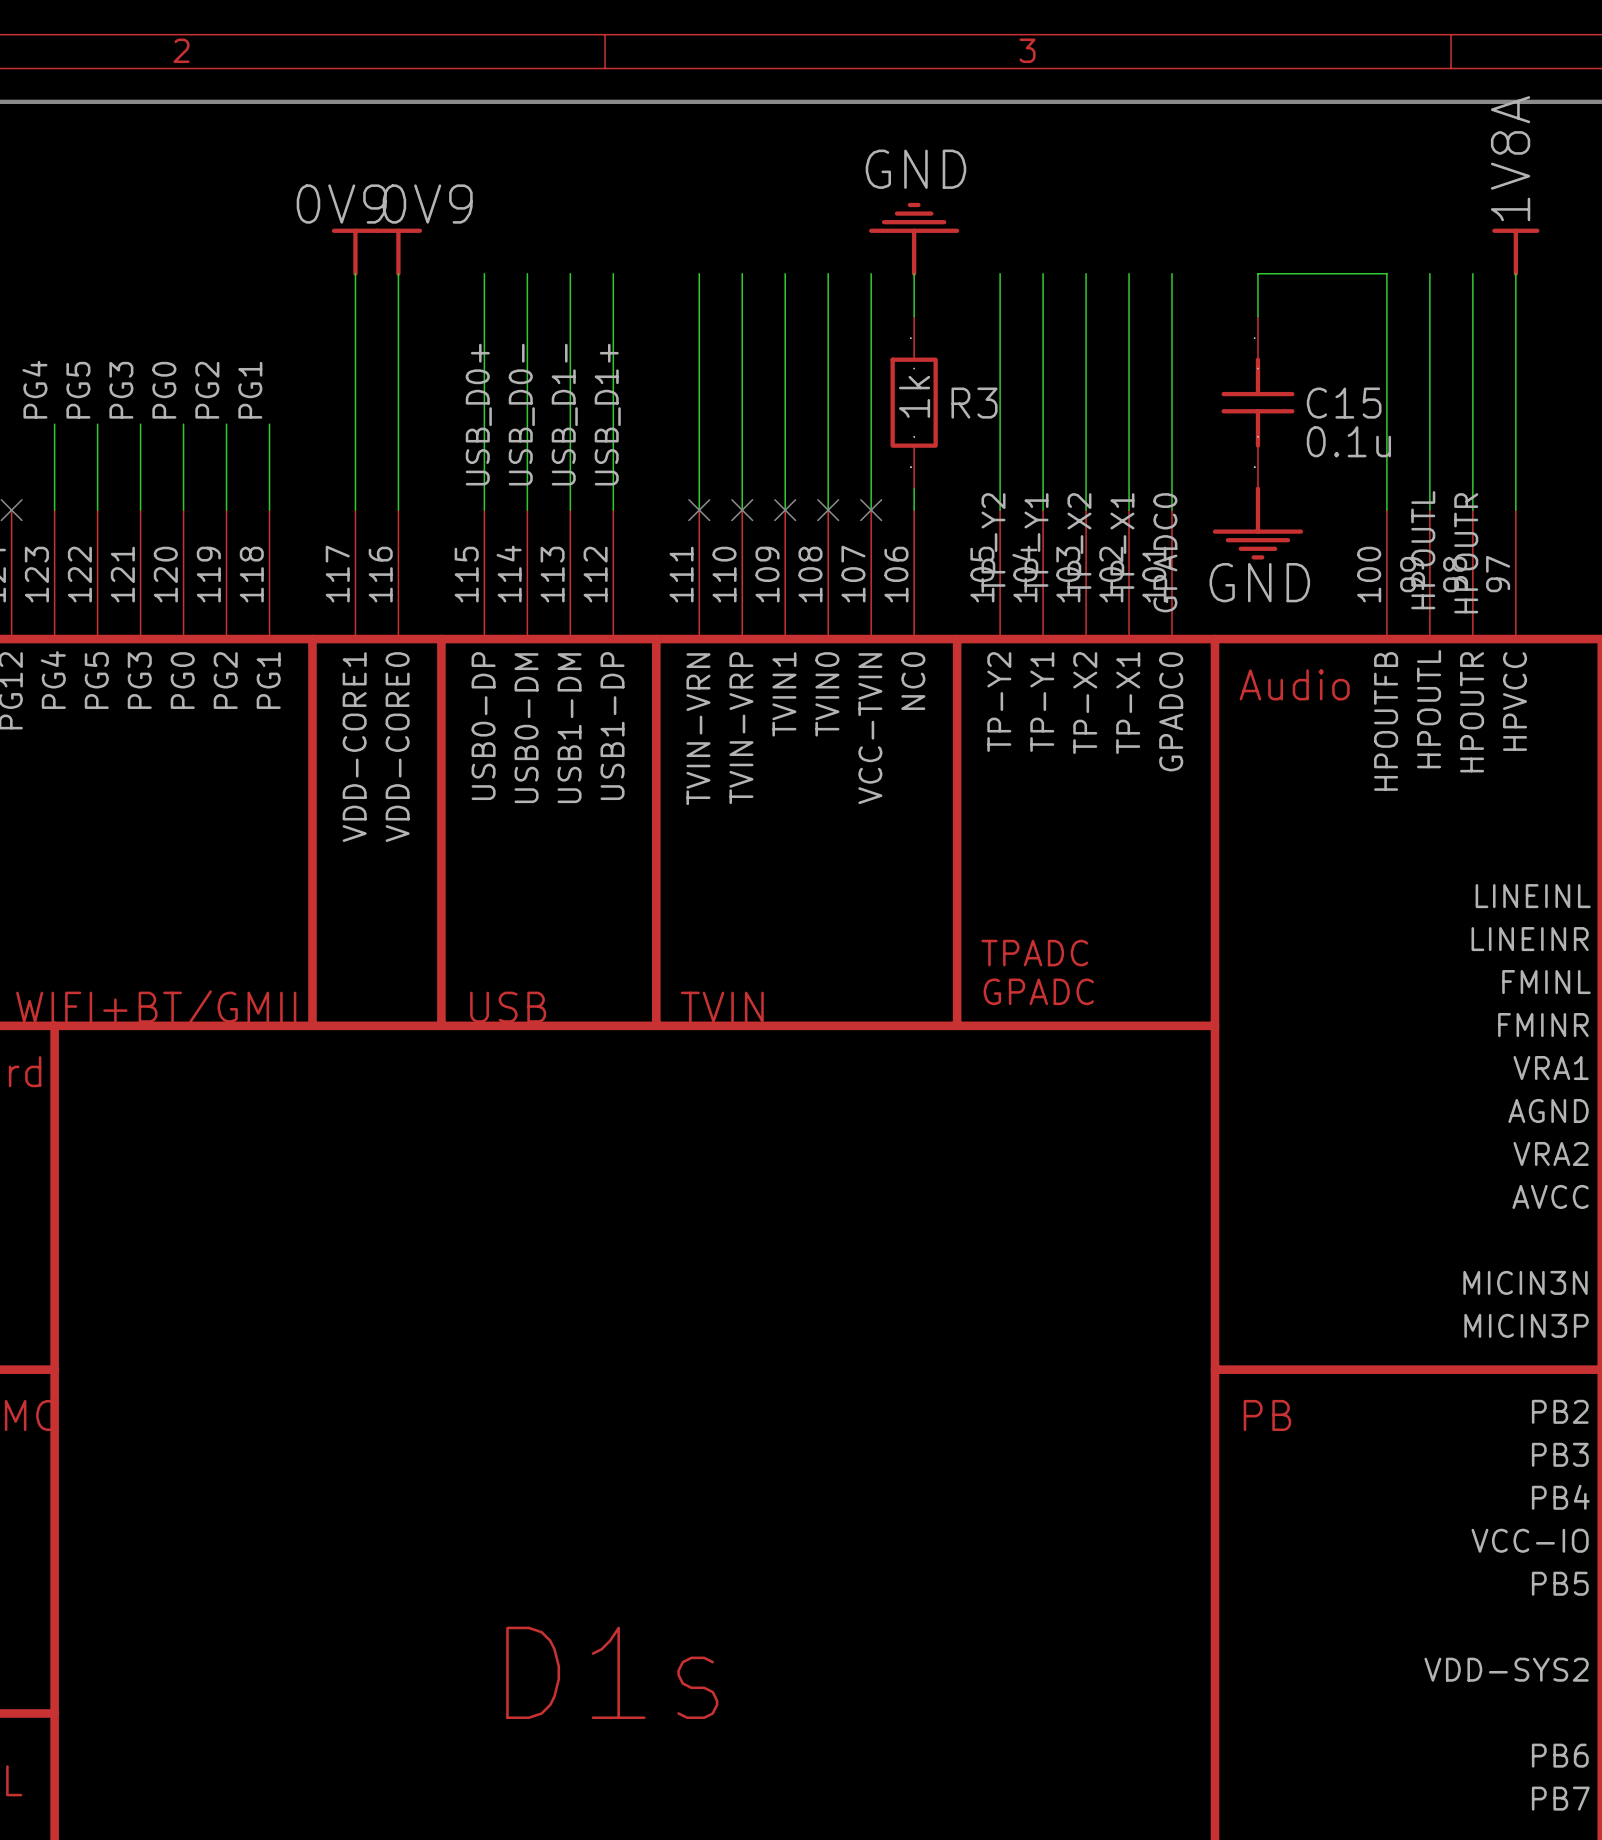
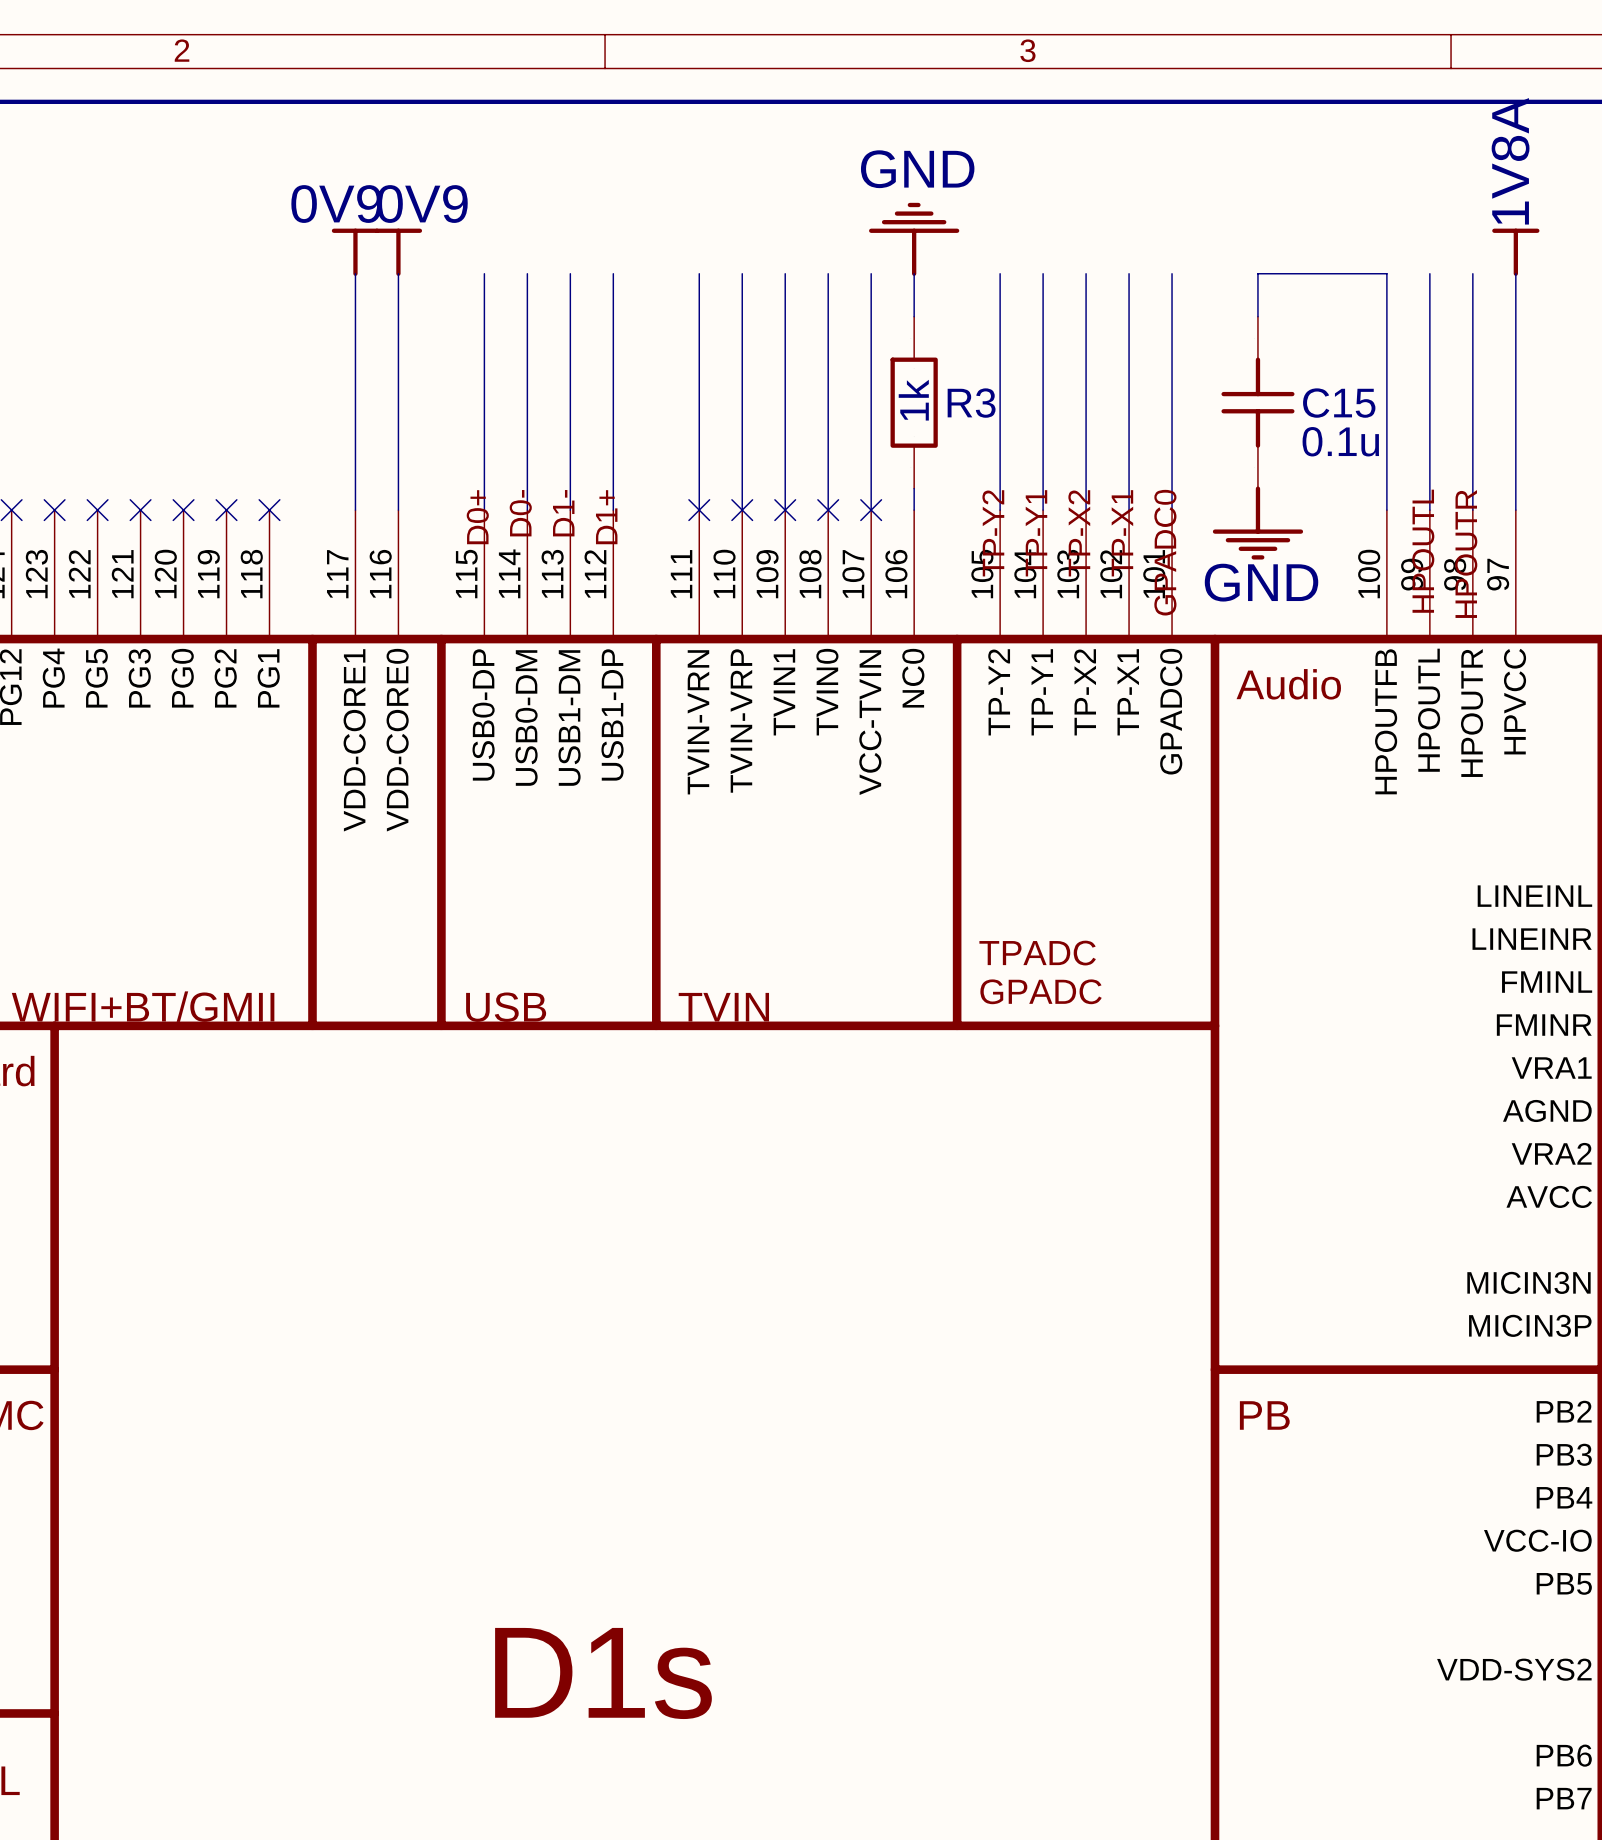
label: PG4 (34, 389) -> none
label: PG5 (78, 390) -> none
label: PG3 (121, 390) -> none
label: PG0 (164, 390) -> none
label: PG2 (207, 390) -> none
label: PG1 (250, 390) -> none
label: USB_D0+ (478, 414) -> none
label: USB_D0- (521, 414) -> none
label: USB_D1- (564, 414) -> none
label: USB_D1+ (607, 414) -> none
wire: (54, 424) (54, 510) -> none
wire: (97, 424) (97, 510) -> none
wire: (140, 424) (140, 510) -> none
wire: (183, 424) (183, 510) -> none
wire: (226, 424) (226, 510) -> none
wire: (269, 424) (269, 510) -> none
no-connect mark: none -> (54, 510)
no-connect mark: none -> (97, 510)
no-connect mark: none -> (140, 510)
no-connect mark: none -> (183, 510)
no-connect mark: none -> (226, 510)
no-connect mark: none -> (269, 510)
label: none -> D0+ (477, 517)
label: none -> D0- (520, 513)
label: none -> D1- (563, 513)
label: none -> D1+ (606, 517)

